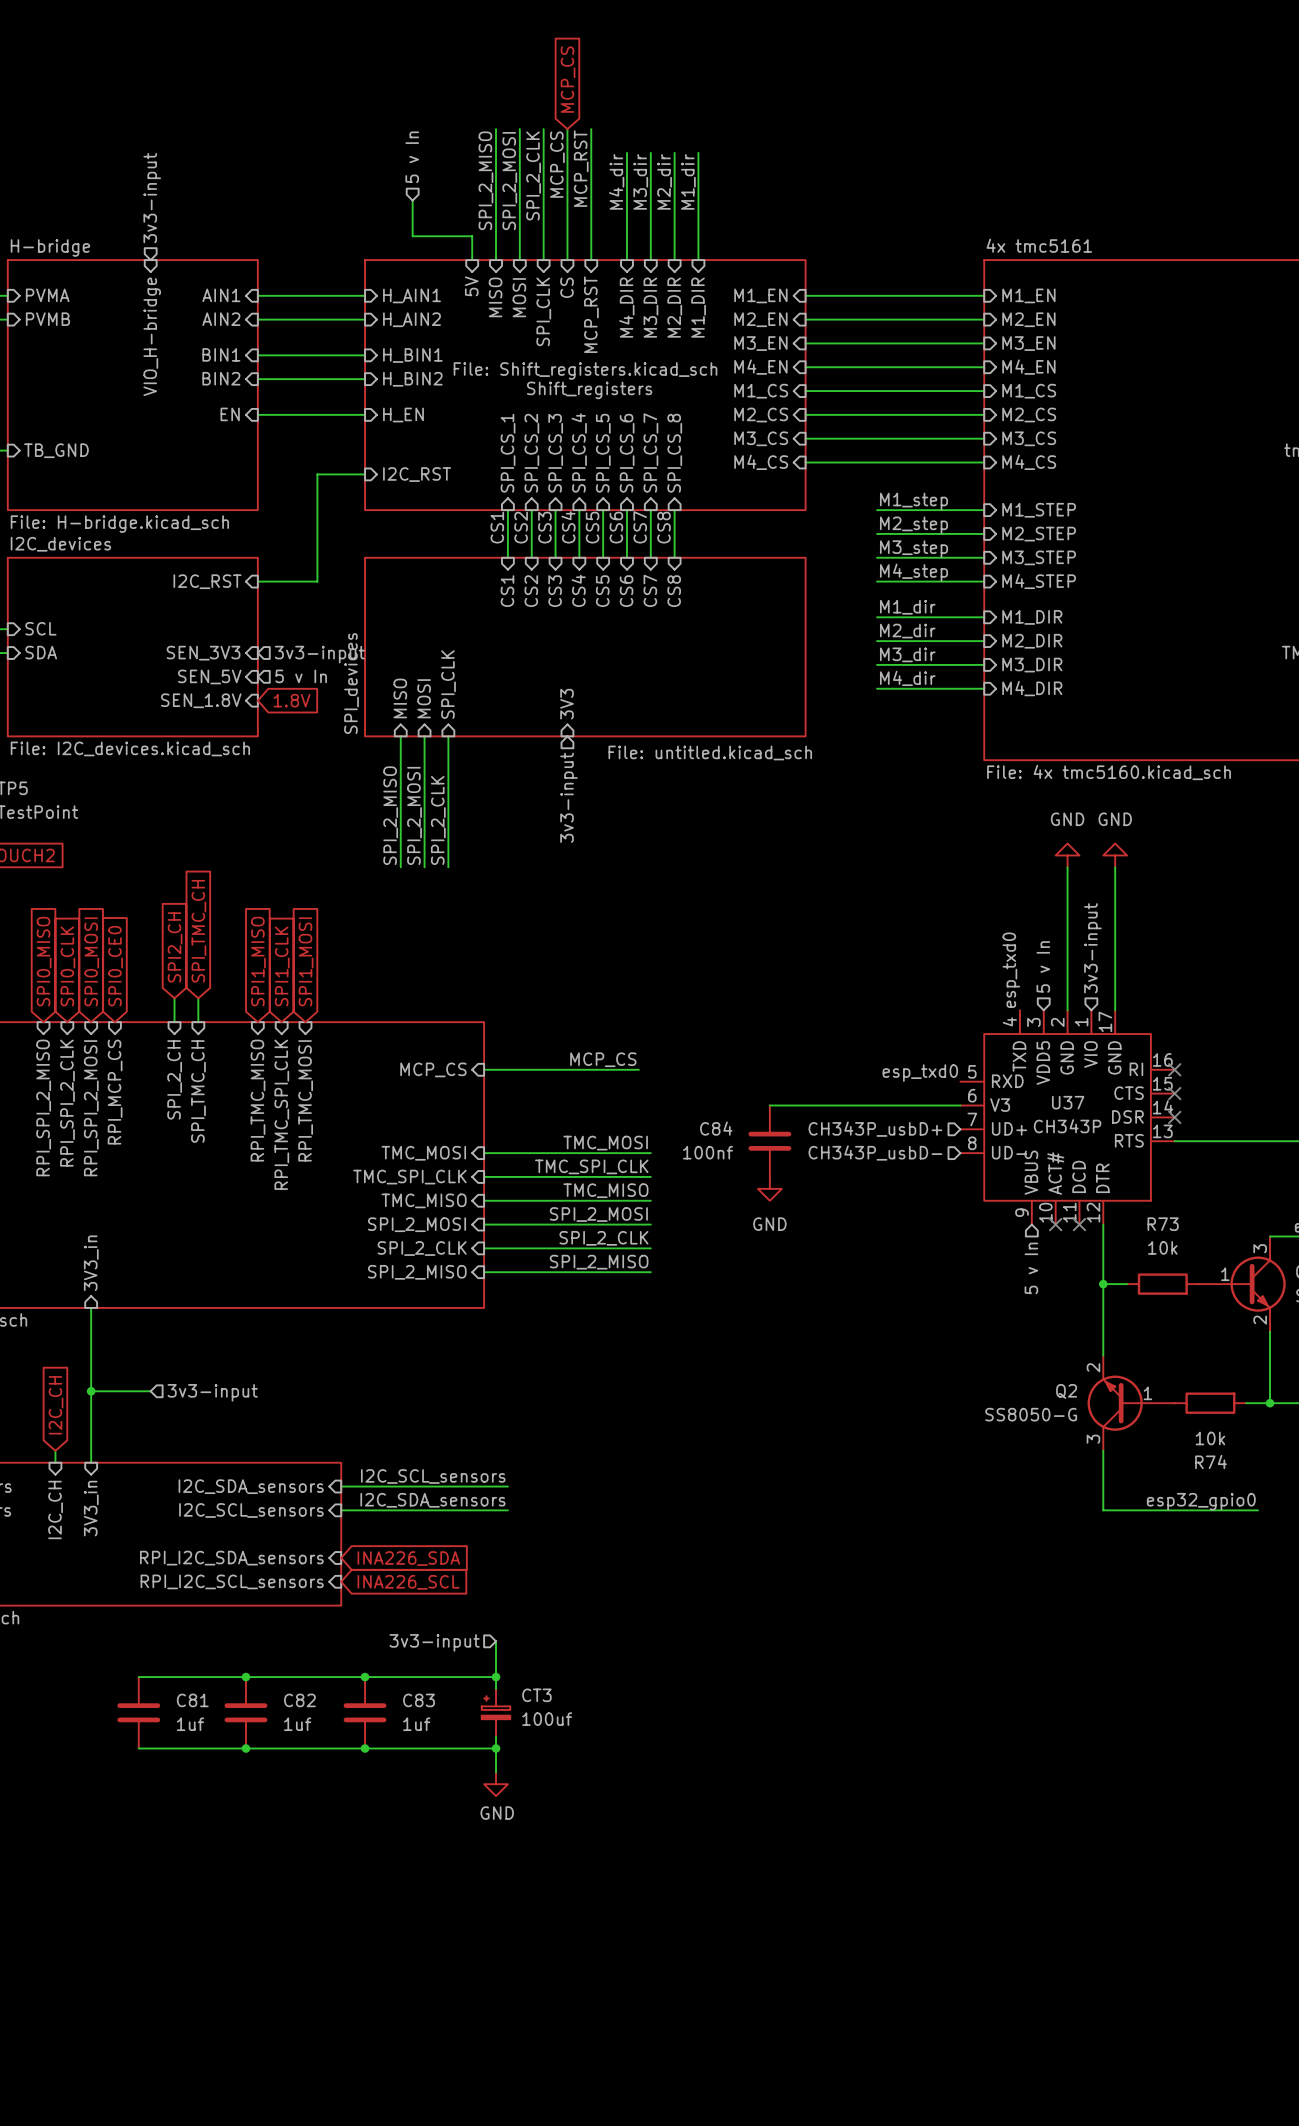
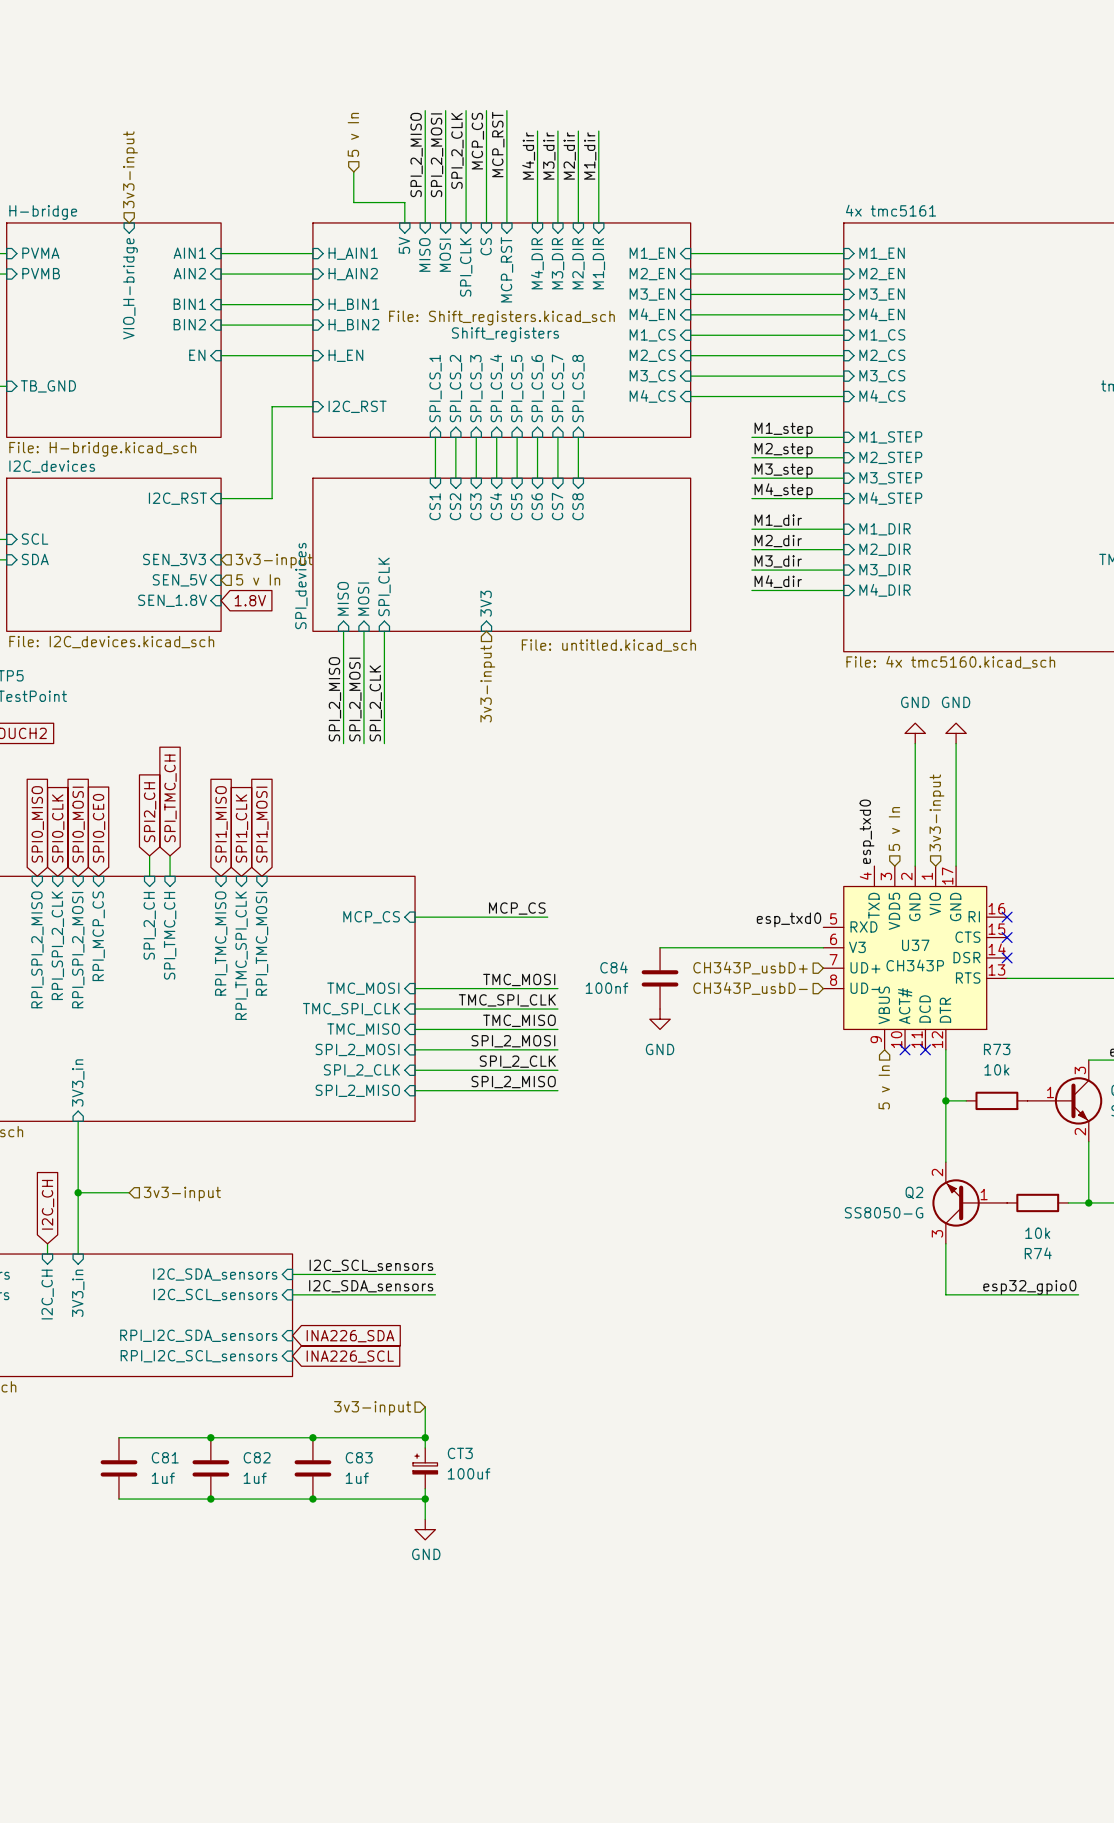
global label: MCP_CS (568, 79) -> none
label: CS1 (497, 527) -> none
label: CS2 (521, 527) -> none
label: CS3 (544, 527) -> none
label: CS4 (568, 527) -> none
label: CS5 (592, 527) -> none
label: CS6 (616, 527) -> none
label: CS7 (640, 527) -> none
label: CS8 (663, 527) -> none

